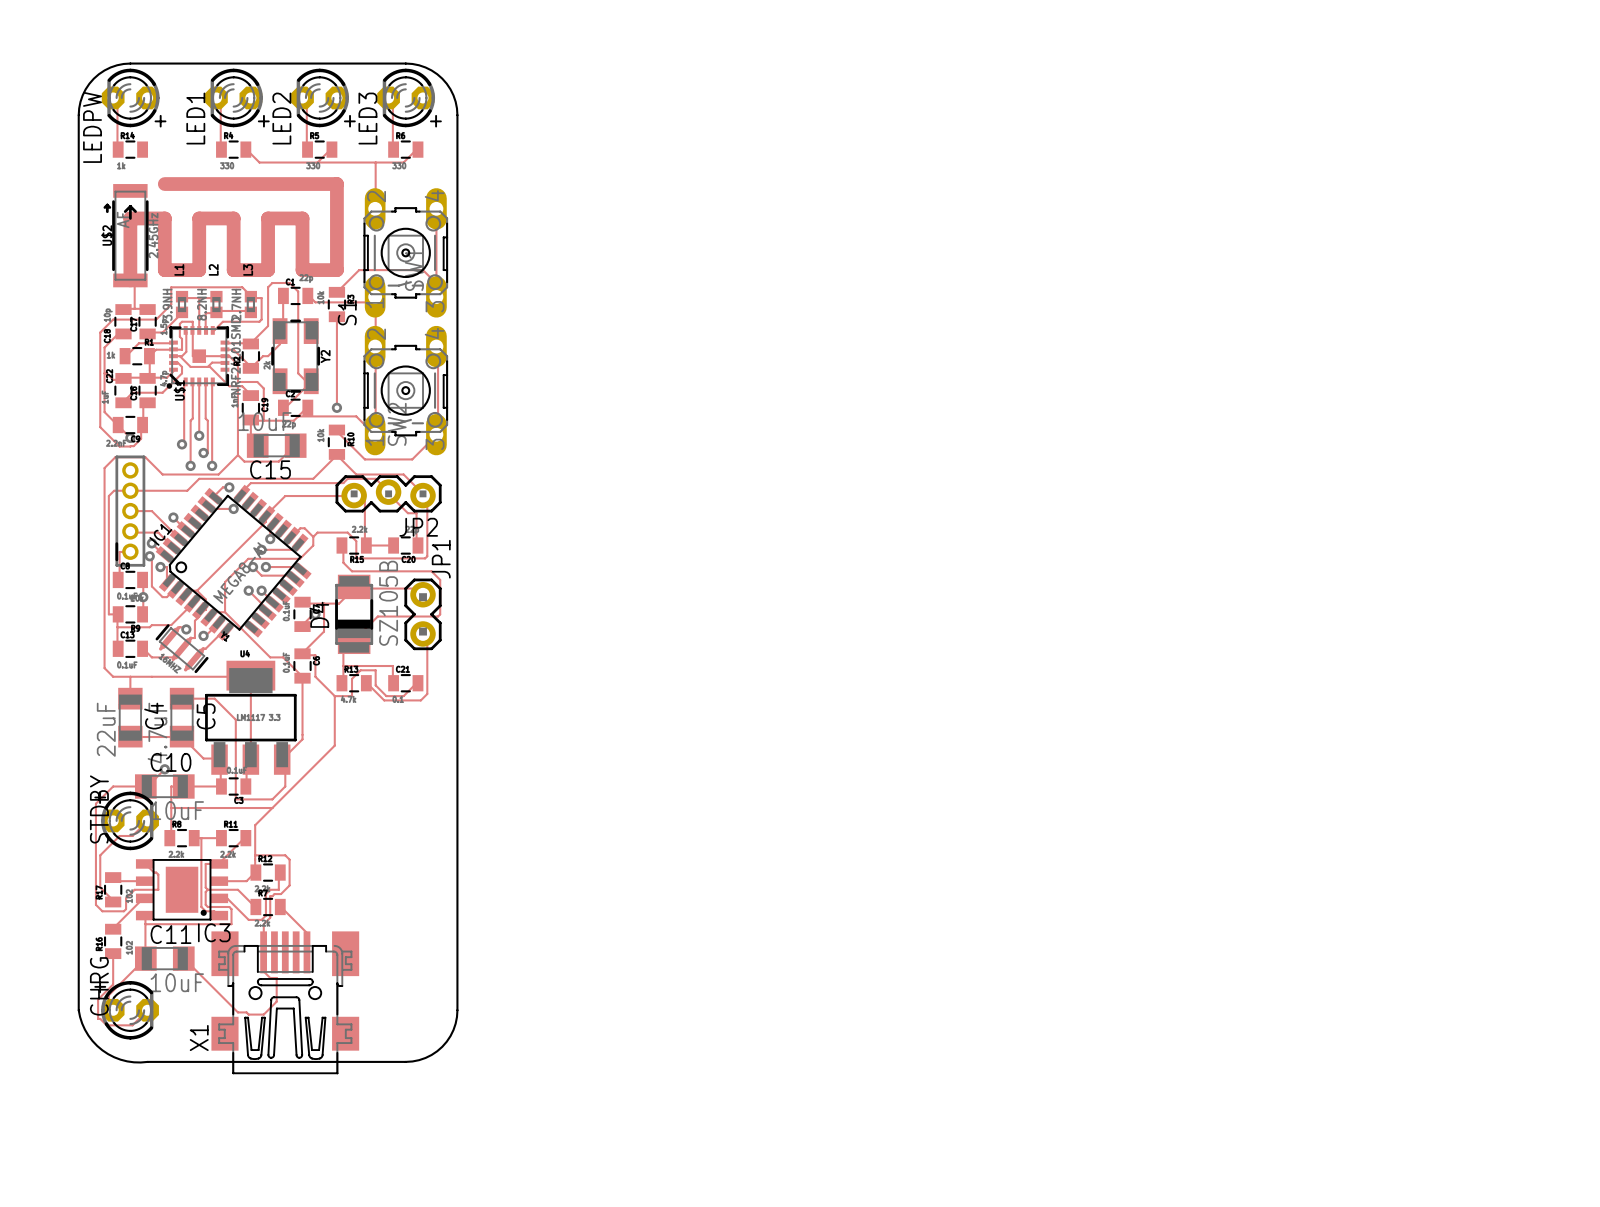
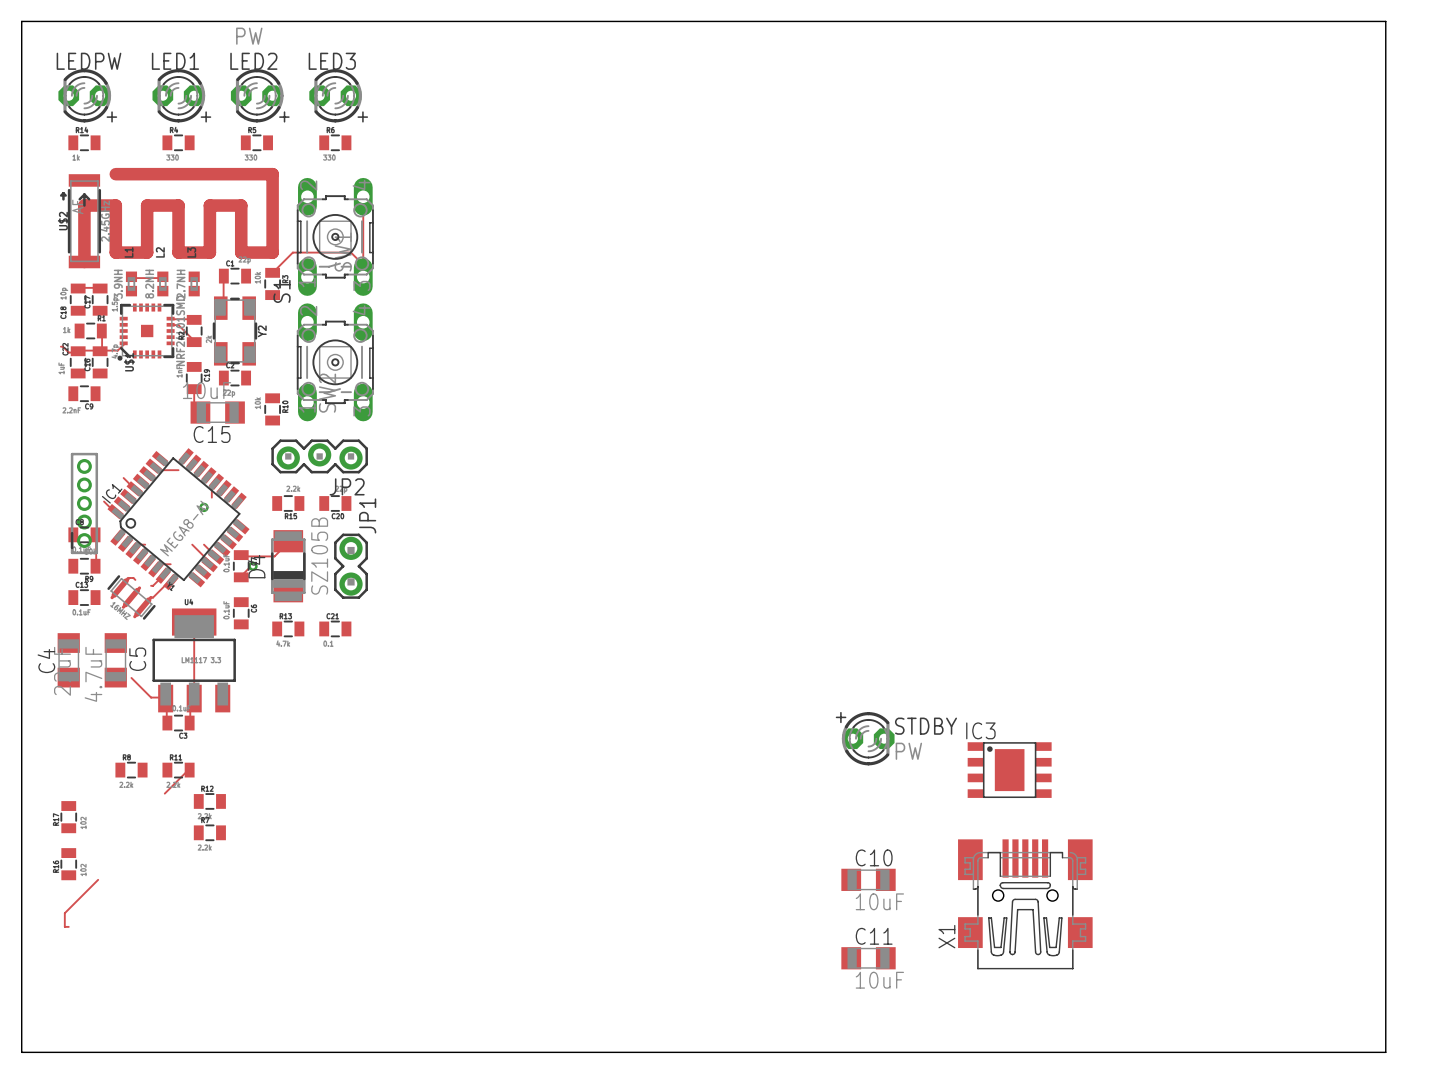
board edge: none -> (21, 21) (1385, 21) (1385, 1052) (21, 1052) (21, 21)
LED2 value: none -> PW (249, 36)
board edge: (130, 63) (412, 63) (425, 67) (437, 74) (450, 89) (455, 101) (457, 115) (457, 1010) (455, 1023) (446, 1041) (431, 1054) (419, 1060) (405, 1061) (133, 1062) (120, 1059) (102, 1050) (88, 1035) (80, 1016) (78, 115) (82, 95) (93, 78) (110, 67) (130, 63) -> none
track: (113, 97) (117, 97) (118, 149) -> none
track: (216, 97) (220, 97) (221, 149) -> none
track: (302, 97) (306, 97) (307, 149) -> none
track: (388, 97) (392, 97) (393, 149) -> none
LED1 name rotation: 0° (195, 118) -> 90° clockwise (175, 61)
LED1 name position: LED1 (195, 118) -> LED1 (175, 61)
LED2 name rotation: 0° (281, 118) -> 90° clockwise (253, 61)
LED2 name position: LED2 (281, 118) -> LED2 (253, 61)
LED3 name rotation: 0° (367, 118) -> 90° clockwise (332, 61)
LED3 name position: LED3 (367, 118) -> LED3 (332, 61)
LEDPW name rotation: 0° (92, 127) -> 90° clockwise (89, 61)
track: (245, 149) (259, 162) (403, 162) (417, 149) -> none
track: (331, 149) (317, 162) -> none
track: (375, 162) (375, 208) -> none
track: (130, 280) (134, 285) (134, 308) -> none
track: (307, 295) (315, 302) (369, 302) (375, 296) (375, 433) (356, 416) (298, 416) -> none
track: (199, 298) (199, 330) -> none
track: (182, 312) (162, 332) (147, 333) -> none
track: (250, 312) (216, 310) (216, 313) (205, 313) (206, 330) -> none
track: (336, 316) (336, 407) -> none
track: (185, 330) (186, 351) (182, 356) (173, 356) -> none
track: (212, 330) (222, 321) (259, 321) (261, 319) (261, 298) (250, 298) (242, 287) (171, 287) (171, 304) (156, 319) (113, 319) (100, 332) (100, 427) (119, 446) (133, 446) (141, 438) (143, 403) (147, 402) -> none
track: (280, 332) (280, 331) (280, 344) (268, 356) (263, 356) (250, 368) (248, 364) -> none
track: (123, 333) (117, 334) (104, 347) (104, 412) (130, 437) -> none
track: (173, 342) (138, 343) (125, 356) -> none
track: (250, 343) (268, 326) (268, 287) (272, 283) (289, 283) (298, 291) (298, 373) (306, 381) (311, 381) (283, 407) -> none
track: (436, 346) (438, 347) (438, 433) (412, 459) (364, 459) (336, 430) -> none
track: (149, 356) (156, 349) (182, 349) (179, 323) (182, 321) (192, 321) (192, 356) (229, 356) (237, 364) (237, 381) (257, 381) (263, 388) (263, 420) -> none
track: (179, 356) (190, 366) (209, 366) (229, 386) (242, 386) (250, 395) -> none
track: (173, 362) (177, 362) (182, 366) (182, 373) (162, 392) (132, 392) (123, 402) -> none
track: (224, 362) (212, 362) (207, 366) -> none
track: (185, 381) (184, 381) (184, 444) (182, 444) -> none
track: (192, 381) (190, 465) -> none
track: (199, 381) (199, 435) -> none
track: (206, 381) (207, 452) (203, 452) -> none
track: (212, 381) (212, 465) -> none
track: (237, 386) (237, 455) -> none
track: (307, 407) (293, 420) (250, 420) -> none
via: (336, 407) -> none
via: (199, 435) -> none
via: (130, 437) -> none
via: (182, 444) -> none
track: (295, 445) (278, 461) (244, 461) (237, 455) -> none
via: (203, 452) -> none
track: (237, 455) (218, 474) (162, 474) (145, 457) (115, 457) (104, 468) (104, 668) (113, 676) (250, 676) -> none
track: (336, 455) (356, 474) (403, 474) (423, 496) (427, 496) (427, 556) (425, 558) (356, 558) (356, 541) (347, 532) (317, 532) (313, 536) -> none
track: (336, 455) (313, 478) (199, 478) (187, 490) (114, 490) (108, 496) (108, 614) (118, 614) -> none
via: (190, 465) -> none
via: (212, 465) -> none
track: (229, 487) (222, 487) (213, 496) -> none
via: (229, 487) -> none
track: (241, 493) (250, 483) (343, 483) (347, 478) (375, 478) (407, 513) (416, 513) (417, 545) -> none
via: (233, 508) -> none
track: (130, 511) (151, 511) (178, 537) -> none
part position: (130, 511) -> (84, 503)
via: (173, 517) -> none
track: (130, 531) (158, 532) (171, 546) -> none
track: (291, 535) (300, 528) (304, 528) (313, 536) -> none
track: (313, 536) (313, 545) (299, 558) (248, 558) (225, 582) (225, 612) (270, 657) (283, 657) (302, 676) (302, 739) (282, 759) (285, 758) (285, 786) (272, 799) (235, 799) (235, 719) (214, 698) (182, 698) -> none
via: (270, 539) -> none
track: (300, 542) (291, 549) (261, 549) -> none
via: (151, 543) -> none
track: (341, 545) (343, 562) (352, 571) (431, 571) (440, 579) (440, 614) (438, 616) (377, 616) (354, 642) (343, 642) (341, 683) -> none
track: (393, 545) (364, 545) (364, 496) (285, 496) (265, 515) (265, 521) (197, 590) (205, 599) (205, 610) (200, 610) (199, 616) (194, 620) (194, 638) (190, 638) (173, 657) (151, 657) (142, 648) -> none
track: (130, 551) (119, 551) (118, 579) -> none
track: (149, 556) (151, 556) (151, 586) (162, 597) (166, 597) (175, 589) -> none
via: (149, 556) -> none
track: (160, 567) (166, 567) (167, 582) -> none
via: (160, 567) -> none
track: (253, 567) (261, 575) (291, 575) (295, 579) -> none
via: (253, 567) -> none
track: (265, 567) (300, 567) (302, 571) -> none
via: (265, 567) -> none
track: (354, 586) (354, 588) (418, 588) (423, 594) -> none
via: (248, 590) -> none
via: (261, 590) -> none
via: (143, 597) -> none
track: (192, 603) (171, 625) (117, 627) -> none
track: (324, 603) (324, 631) (302, 655) (315, 655) (315, 676) (334, 696) -> none
track: (117, 614) (118, 648) -> none
via: (186, 629) -> none
track: (423, 633) (423, 635) (427, 635) (427, 693) (420, 700) (384, 700) (366, 683) -> none
via: (203, 635) -> none
track: (343, 666) (392, 666) (393, 683) -> none
track: (130, 676) (130, 698) -> none
track: (417, 683) (403, 696) (386, 696) (375, 685) (375, 670) (360, 670) (352, 678) (352, 696) (334, 696) -> none
track: (334, 696) (334, 745) (255, 825) (255, 872) -> none
C4 name position: C4 (154, 716) -> C4 (46, 661)
C4 position: (130, 717) -> (68, 660)
C5 position: (182, 717) -> (115, 660)
track: (130, 736) (182, 736) -> none
track: (164, 769) (147, 786) (113, 786) (95, 803) (95, 904) (102, 911) (123, 911) (126, 909) (126, 898) (134, 889) (158, 889) (158, 874) (144, 863) -> none
via: (164, 769) -> none
C10 position: (164, 786) -> (868, 879)
track: (221, 786) (171, 786) (169, 838) -> none
STDBY: none -> PW (865, 738)
track: (171, 808) (272, 808) -> none
STDBY: (126, 820) -> none
track: (147, 820) (132, 835) (119, 835) (100, 855) (100, 887) (113, 901) -> none
track: (194, 838) (221, 838) -> none
track: (201, 838) (201, 906) (205, 911) (214, 911) (219, 915) -> none
track: (255, 855) (285, 855) (289, 859) (289, 885) (280, 894) (270, 896) (270, 917) (263, 924) (263, 971) (270, 977) (276, 977) (276, 1001) (263, 1014) (237, 1012) (183, 958) -> none
track: (219, 863) (205, 863) (205, 887) (207, 889) -> none
track: (255, 872) (246, 881) (219, 881) -> none
track: (280, 872) (278, 889) (270, 889) (265, 894) (265, 915) (261, 919) (248, 919) (227, 898) (219, 898) -> none
track: (113, 877) (115, 881) (144, 881) -> none
IC3 rotation: 0° (182, 889) -> 180° (1009, 770)
IC3 position: (182, 889) -> (1009, 770)
track: (207, 889) (237, 889) (255, 906) -> none
track: (207, 889) (205, 891) (205, 904) (207, 906) (229, 906) (231, 909) (231, 924) (145, 924) -> none
track: (144, 898) (113, 929) -> none
track: (280, 906) (306, 932) (306, 952) -> none
track: (144, 915) (145, 958) -> none
track: (113, 953) (113, 984) (98, 999) (98, 1018) (106, 1025) (132, 1025) (147, 1010) -> none
C11 position: (164, 958) -> (868, 958)
X1 position: (285, 1002) -> (1025, 904)
CHRG: (126, 1010) -> none

